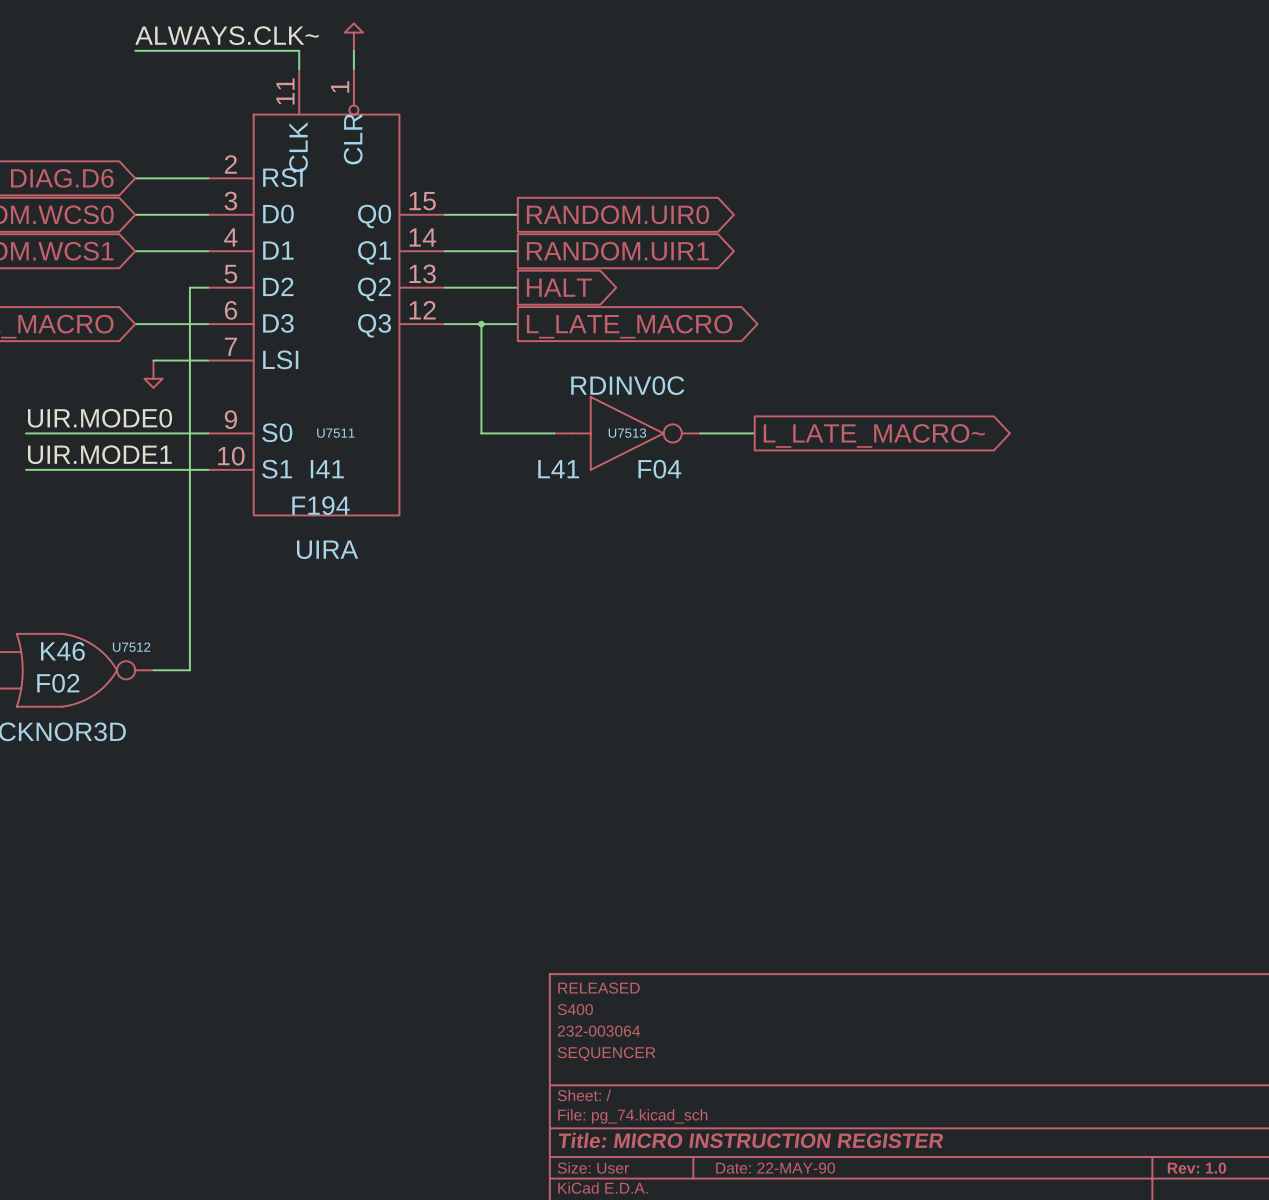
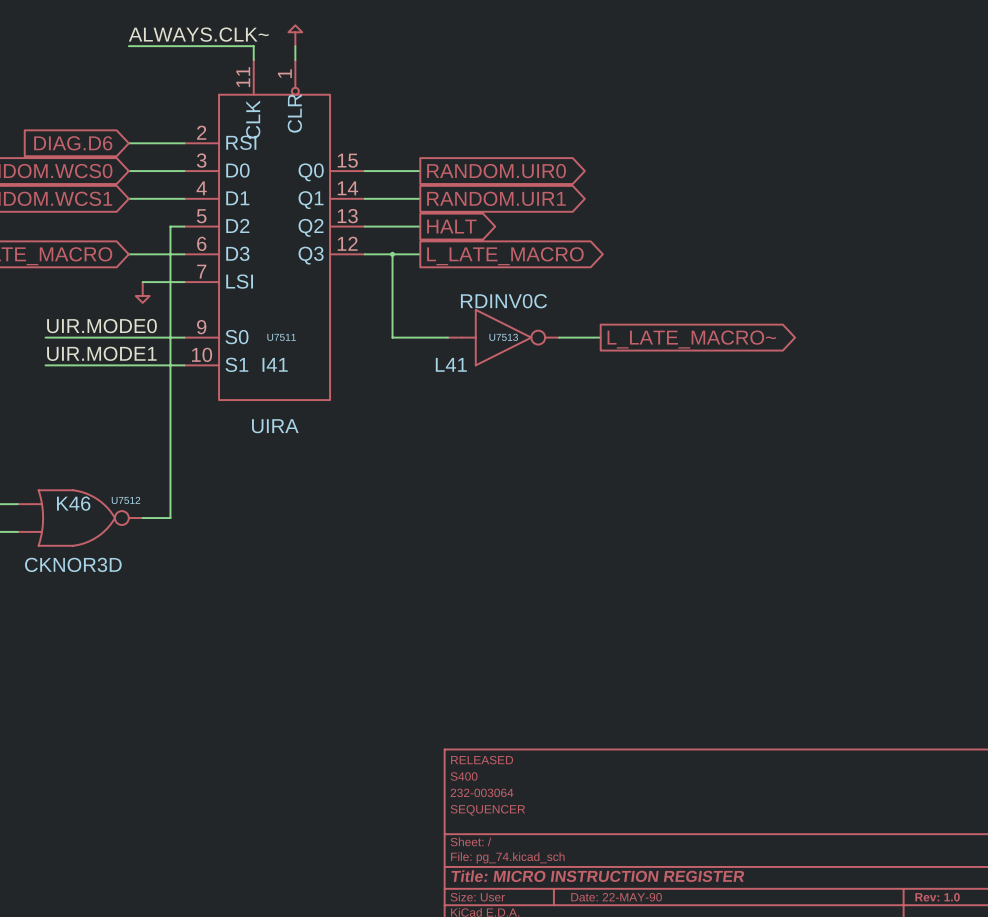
U7513 value: F04 (659, 469) -> none
U7511 value: F194 (321, 505) -> none
U7512 value: F02 (58, 683) -> none

